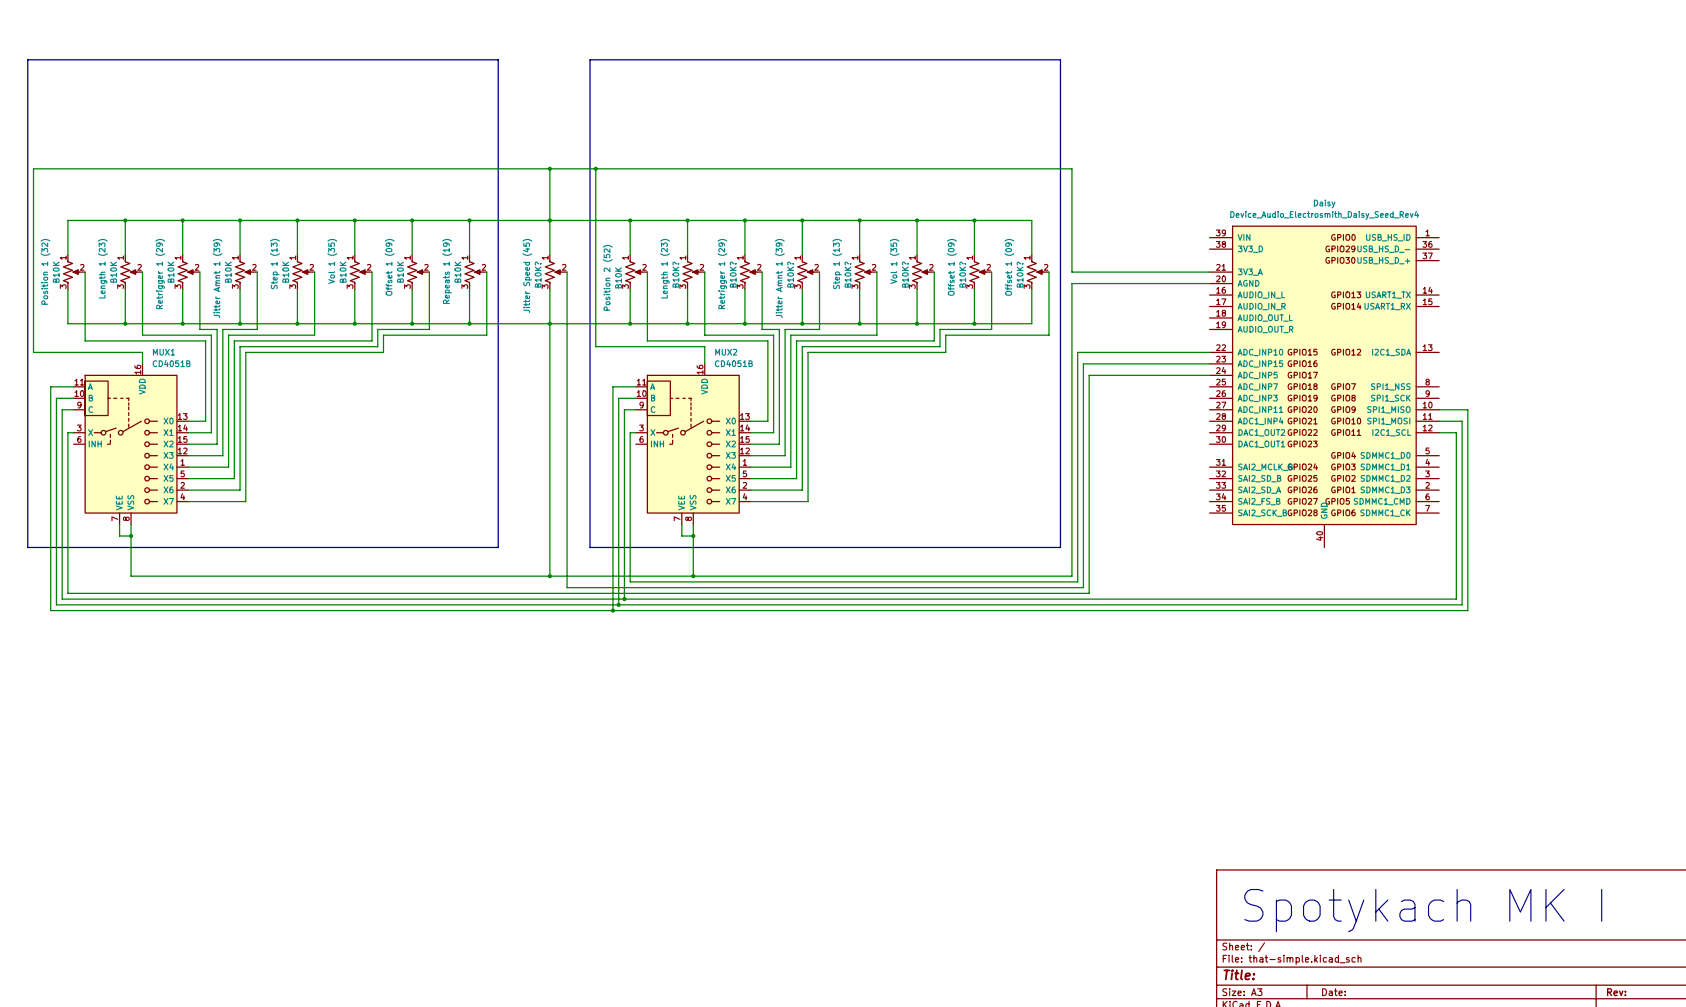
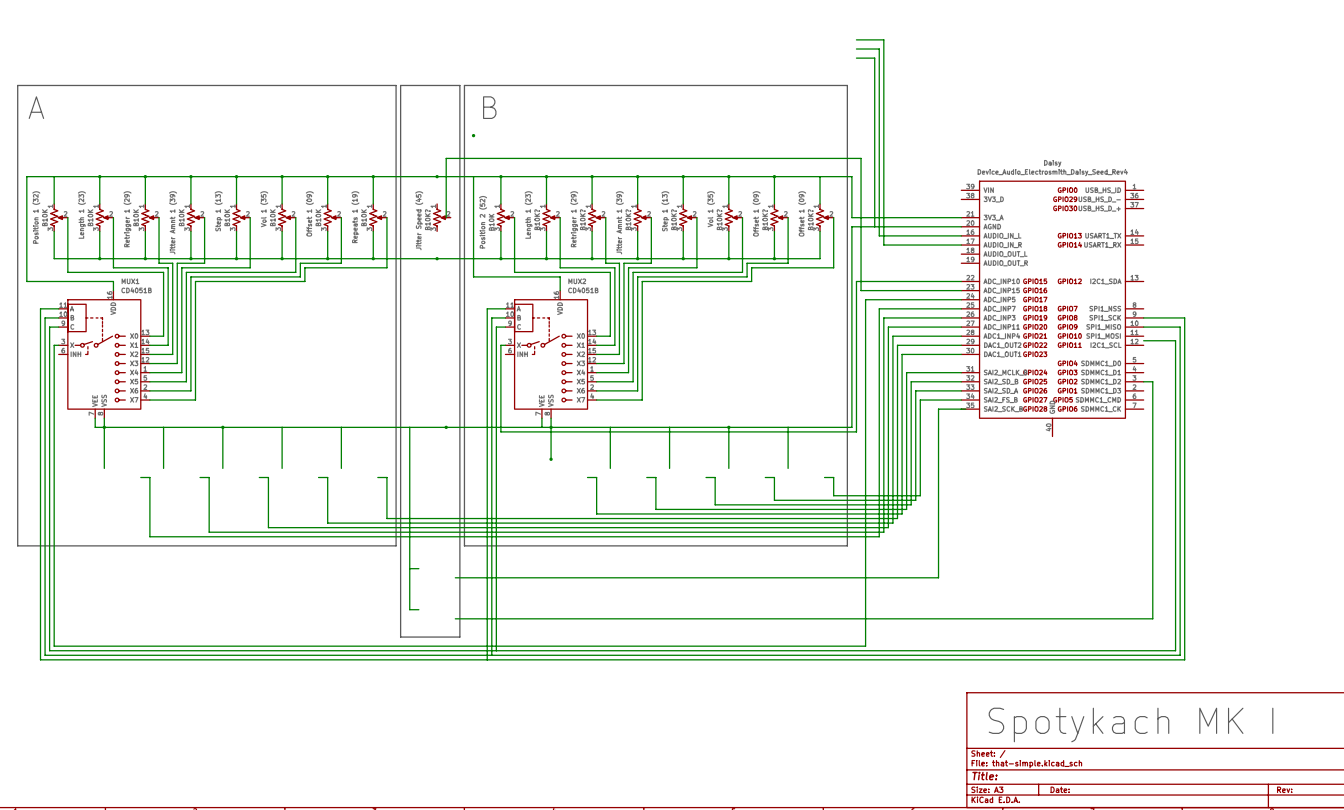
wire: none -> (856, 39) (883, 39) (883, 245) (961, 245)
line: (590, 59) (590, 547) (1060, 547) (1060, 59) (590, 59) -> (464, 85) (464, 545) (847, 545) (847, 85) (464, 85)
wire: none -> (856, 49) (879, 49) (879, 235) (961, 235)
wire: none -> (856, 58) (874, 58) (874, 226)
line: (498, 105) (498, 59) (27, 59) (27, 547) (498, 547) -> (396, 85) (17, 85) (17, 545) (396, 545) (396, 436)
line: none -> (400, 85) (459, 85) (459, 637) (400, 637) (400, 85)
text: none -> A (36, 107)
text: none -> B (489, 107)
wire: (549, 168) (549, 254) -> none
junction: (549, 168) -> none
wire: (595, 168) (595, 220) -> none
wire: (33, 220) (33, 168) (1071, 168) (1071, 220) -> (820, 176) (851, 176)
wire: none -> (26, 176) (54, 176)
wire: (567, 272) (567, 587) (1083, 587) (1083, 363) -> (446, 217) (446, 158) (861, 158) (861, 290)
wire: (549, 289) (549, 576) -> none
wire: none -> (1143, 317) (1184, 317) (1184, 659) (40, 659) (40, 486)
wire: (1467, 409) (1467, 610) (50, 610) -> (1166, 327) (1180, 327) (1180, 655) (45, 655) (45, 482)
wire: (1439, 421) (1462, 421) (1462, 604) (56, 604) -> none
wire: (1439, 432) (1456, 432) (1456, 599) (1049, 599) -> (961, 400) (920, 400) (920, 495) (833, 495) (833, 477)
wire: none -> (1143, 381) (1152, 381) (1152, 618) (455, 618)
wire: none -> (965, 409) (938, 409) (938, 577) (455, 577)
wire: none -> (104, 427) (541, 427)
wire: none -> (163, 427) (163, 468)
wire: none -> (222, 427) (222, 468)
junction: none -> (222, 427)
wire: none -> (282, 427) (282, 468)
wire: none -> (341, 427) (341, 468)
wire: none -> (409, 427) (409, 609) (418, 609)
junction: none -> (446, 427)
wire: none -> (610, 427) (610, 468)
wire: none -> (669, 427) (669, 468)
wire: none -> (728, 427) (728, 468)
junction: none -> (728, 427)
wire: none -> (788, 427) (788, 468)
wire: (1071, 536) (1071, 576) (131, 576) -> (851, 427) (551, 427)
wire: (630, 541) (630, 581) (1077, 581) (1077, 541) -> (500, 431) (856, 431)
wire: none -> (104, 459) (104, 468)
junction: (549, 576) -> none
wire: (67, 593) (1089, 593) -> (54, 472) (54, 646) (865, 646) (865, 472)
wire: (62, 599) (176, 599) -> (49, 477) (49, 650) (1175, 650) (1175, 340) (1143, 340)
wire: (188, 599) (251, 599) -> (149, 477) (149, 536) (879, 536) (879, 308) (961, 308)
wire: (262, 599) (326, 599) -> (209, 477) (209, 532) (883, 532) (883, 317) (961, 317)
wire: (337, 599) (400, 599) -> (268, 477) (268, 527) (888, 527) (888, 327) (961, 327)
wire: (412, 599) (475, 599) -> (327, 477) (327, 523) (892, 523) (892, 336) (961, 336)
wire: (486, 599) (739, 599) -> (386, 477) (386, 518) (897, 518) (897, 345) (961, 345)
wire: none -> (496, 477) (496, 650)
junction: (624, 599) -> none
wire: (750, 599) (813, 599) -> (596, 477) (596, 513) (902, 513) (902, 354) (961, 354)
wire: (825, 599) (888, 599) -> (655, 477) (655, 509) (906, 509) (906, 372) (961, 372)
wire: (899, 599) (962, 599) -> (715, 477) (715, 504) (911, 504) (911, 381) (961, 381)
wire: (974, 599) (1037, 599) -> (774, 477) (774, 500) (915, 500) (915, 390) (961, 390)
wire: none -> (491, 482) (491, 655)
junction: (618, 604) -> none
wire: none -> (487, 486) (487, 659)
junction: (612, 610) -> none
wire: none -> (409, 568) (418, 568)

